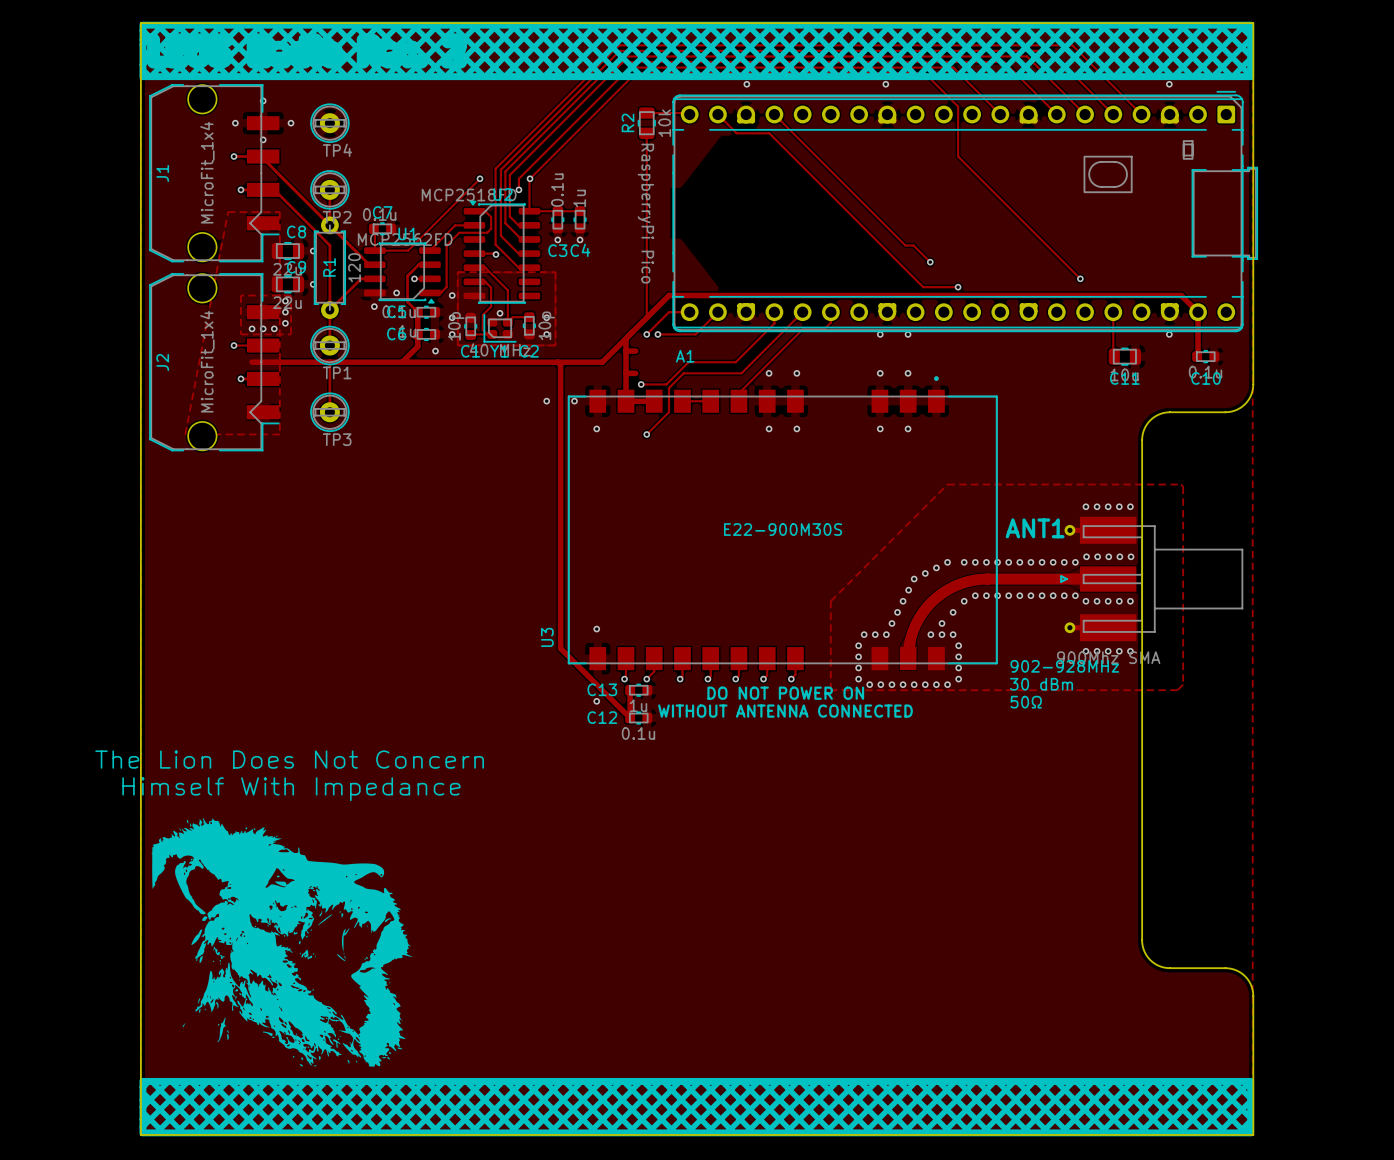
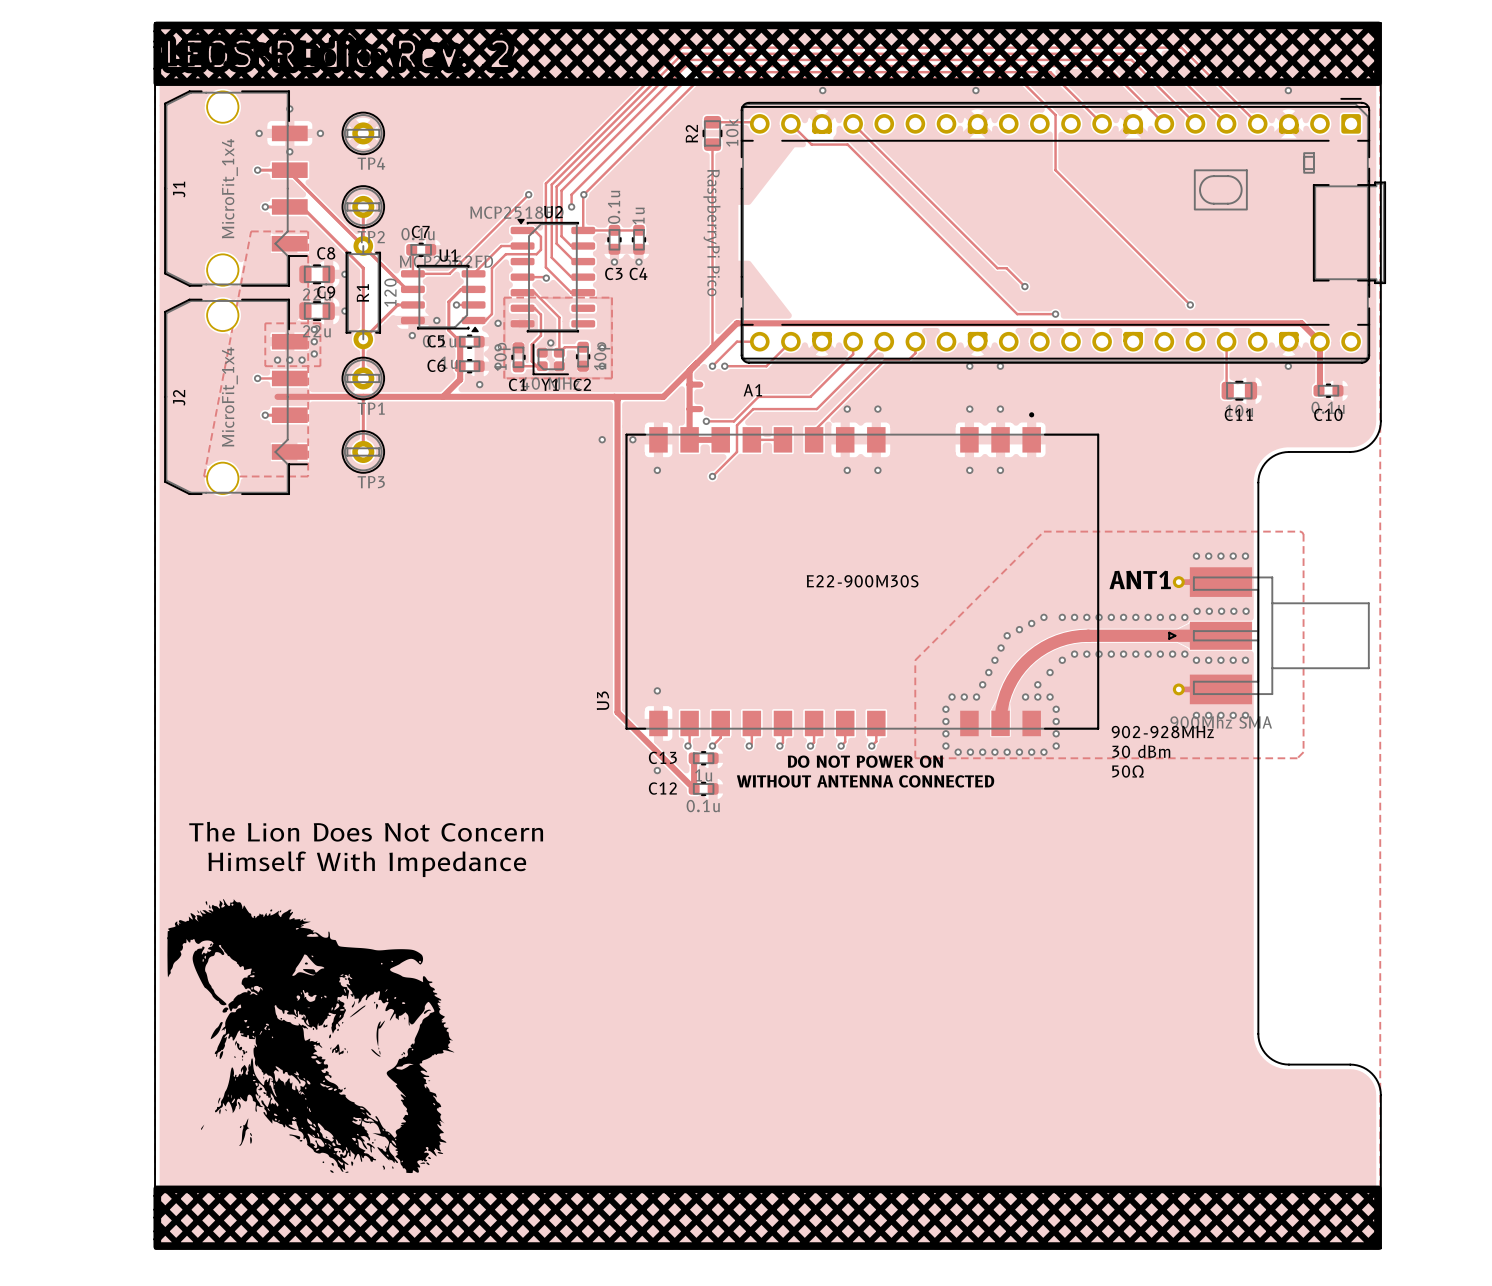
text position: The Lion Does Not Concern (289, 759) -> The Lion Does Not Concern (366, 831)
text position: Himself With Impedance (291, 789) -> Himself With Impedance (367, 864)

